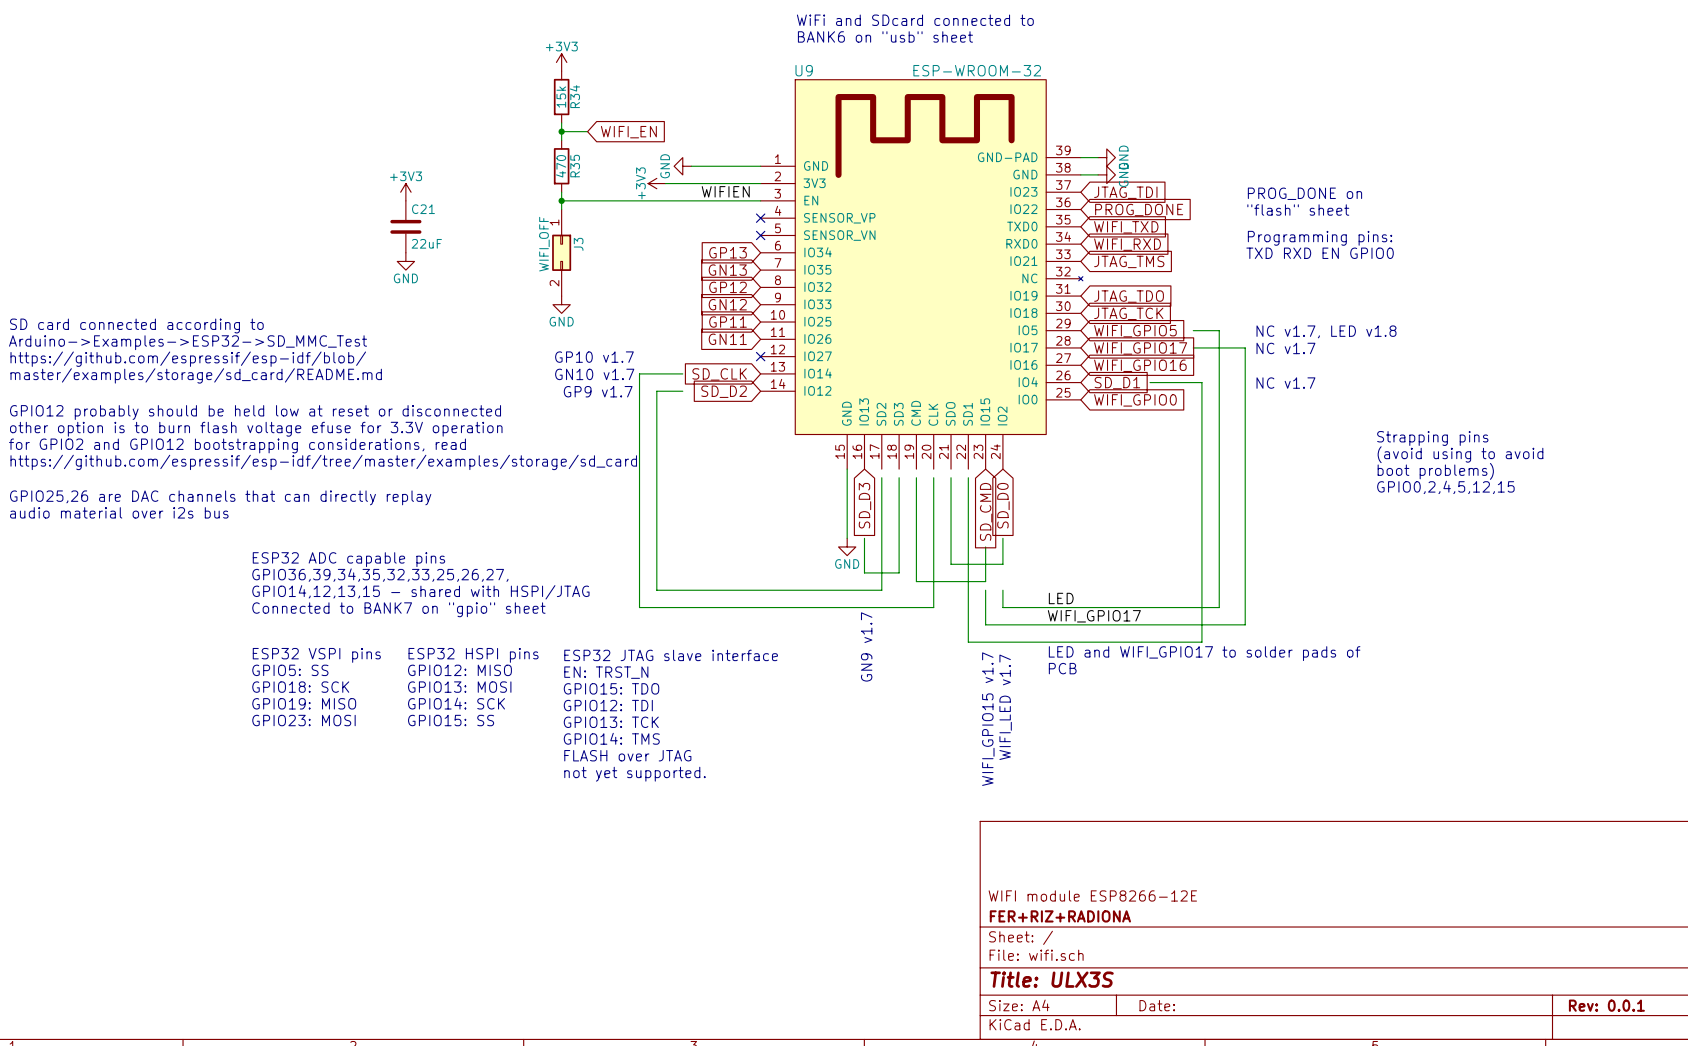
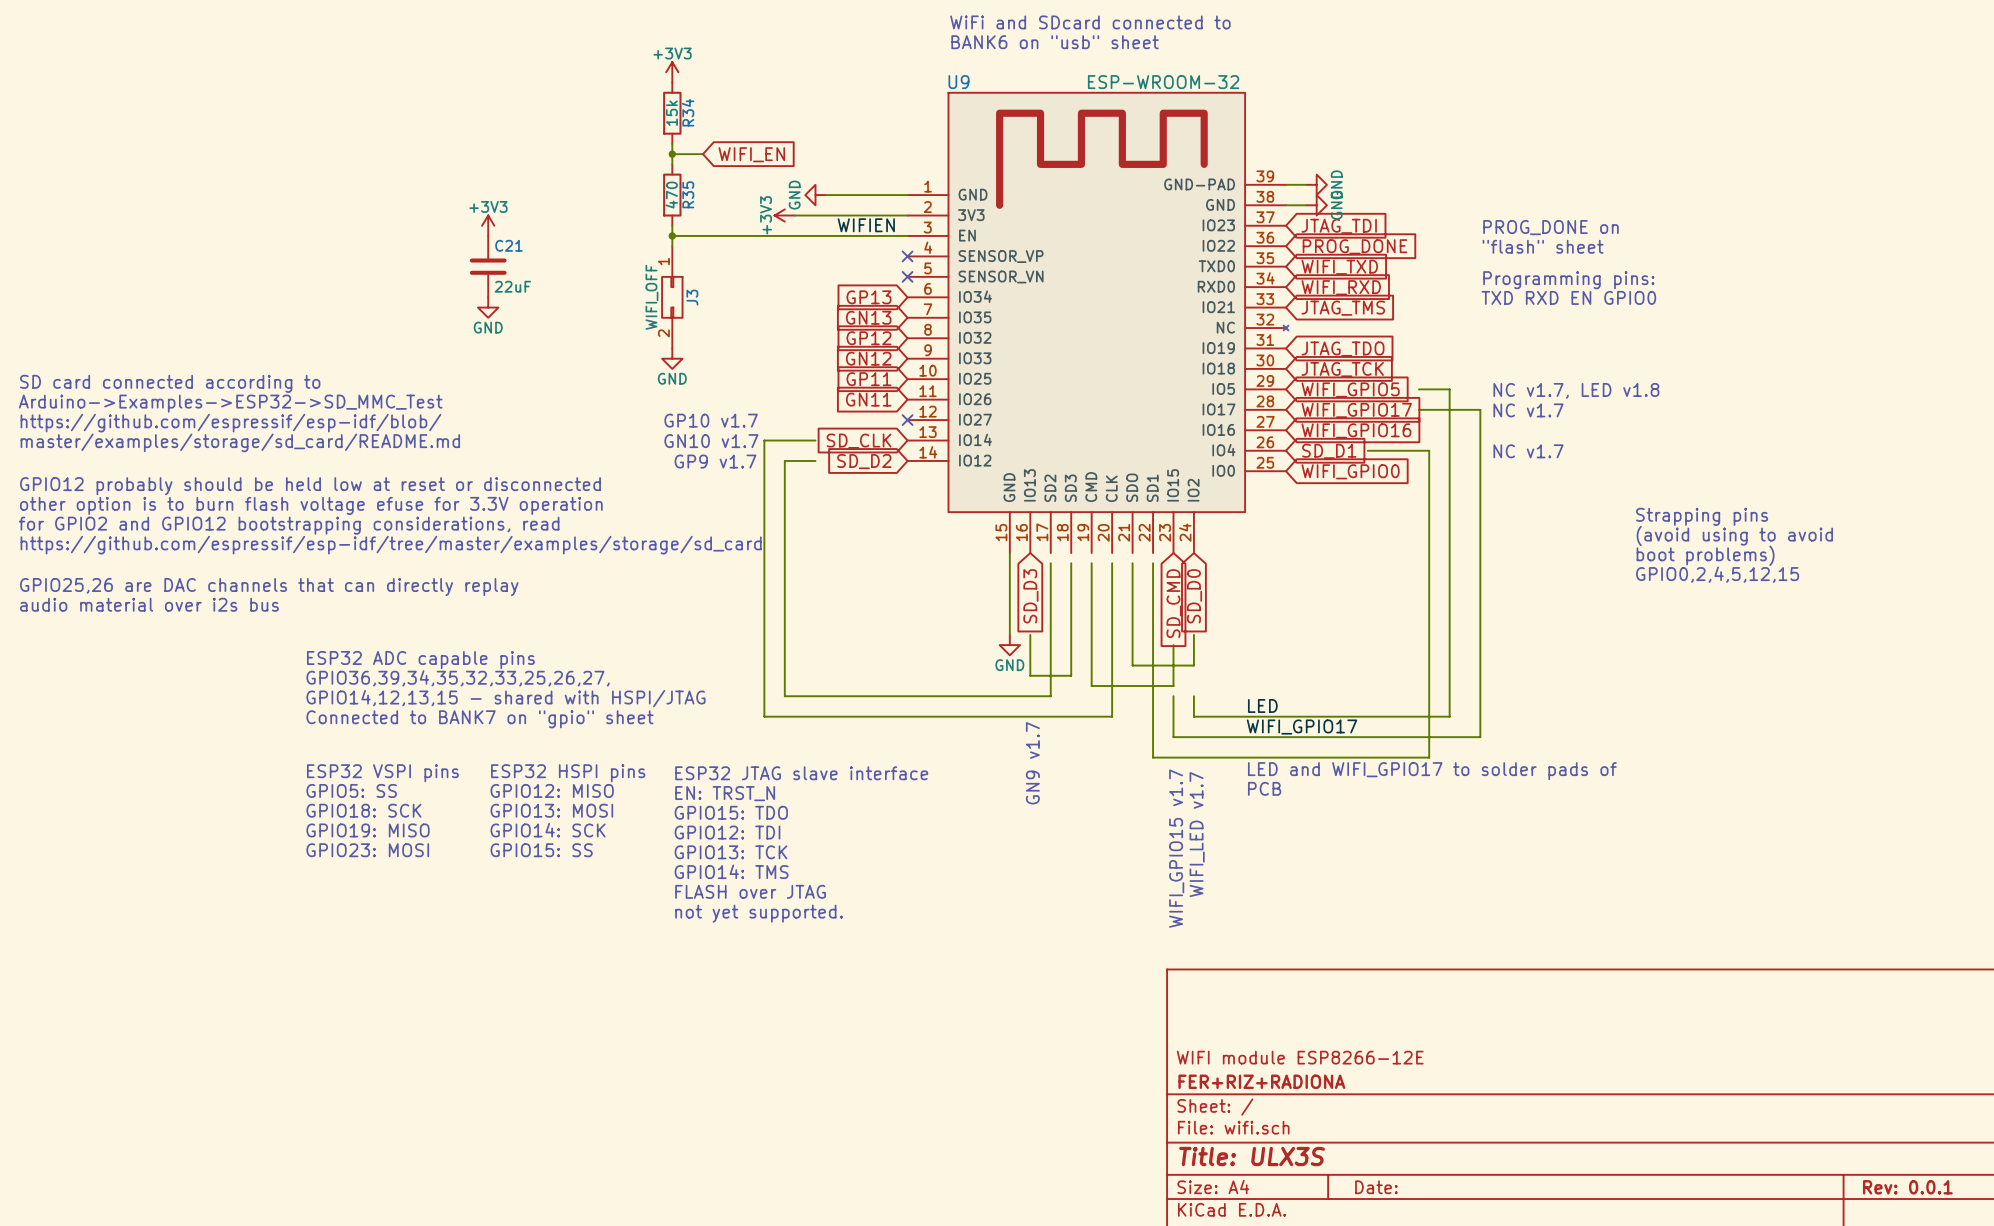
J3 symbol: [552, 209, 572, 297] -> [662, 246, 683, 349]

